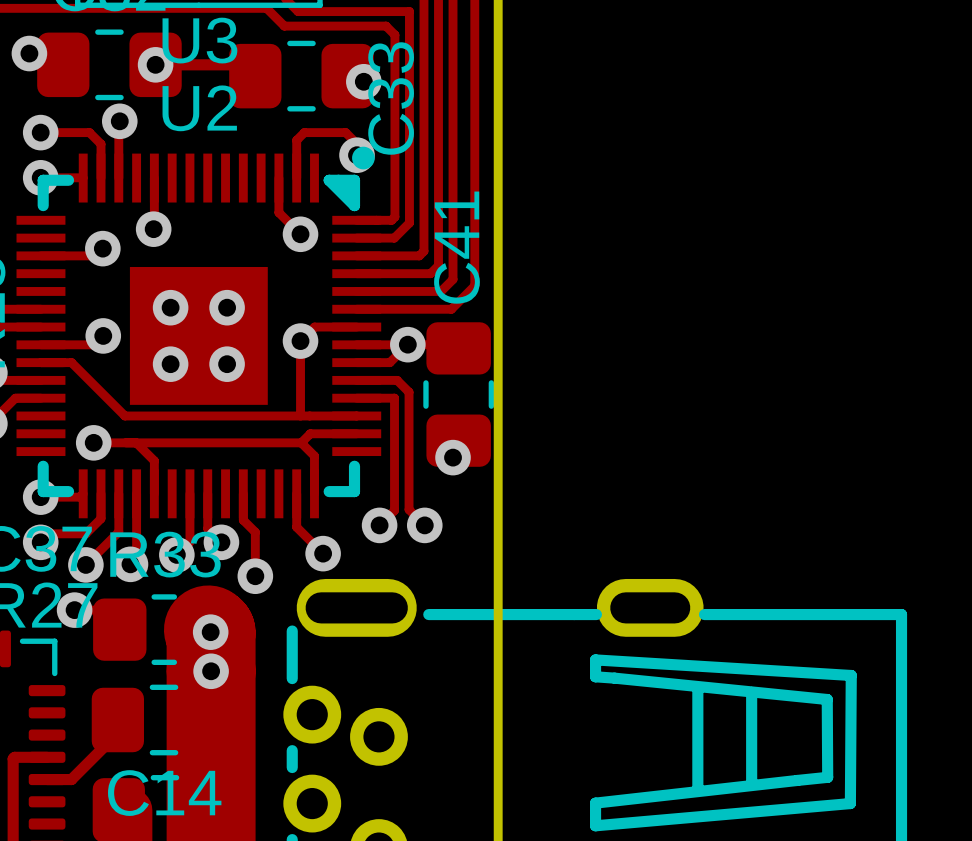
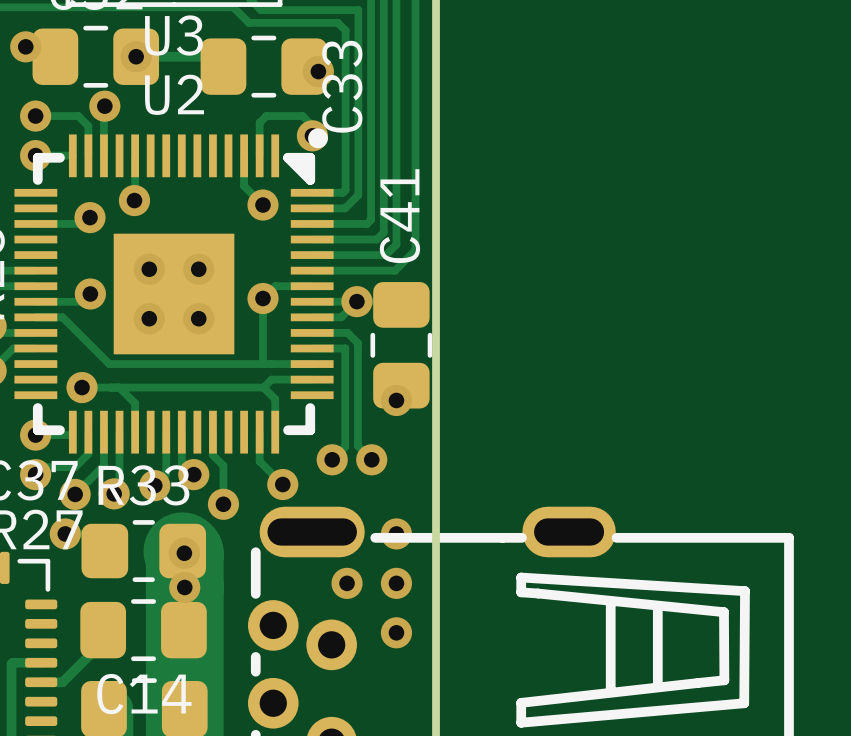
via: none -> (396, 533)
via: none -> (347, 583)
via: none -> (396, 583)
via: none -> (396, 632)

